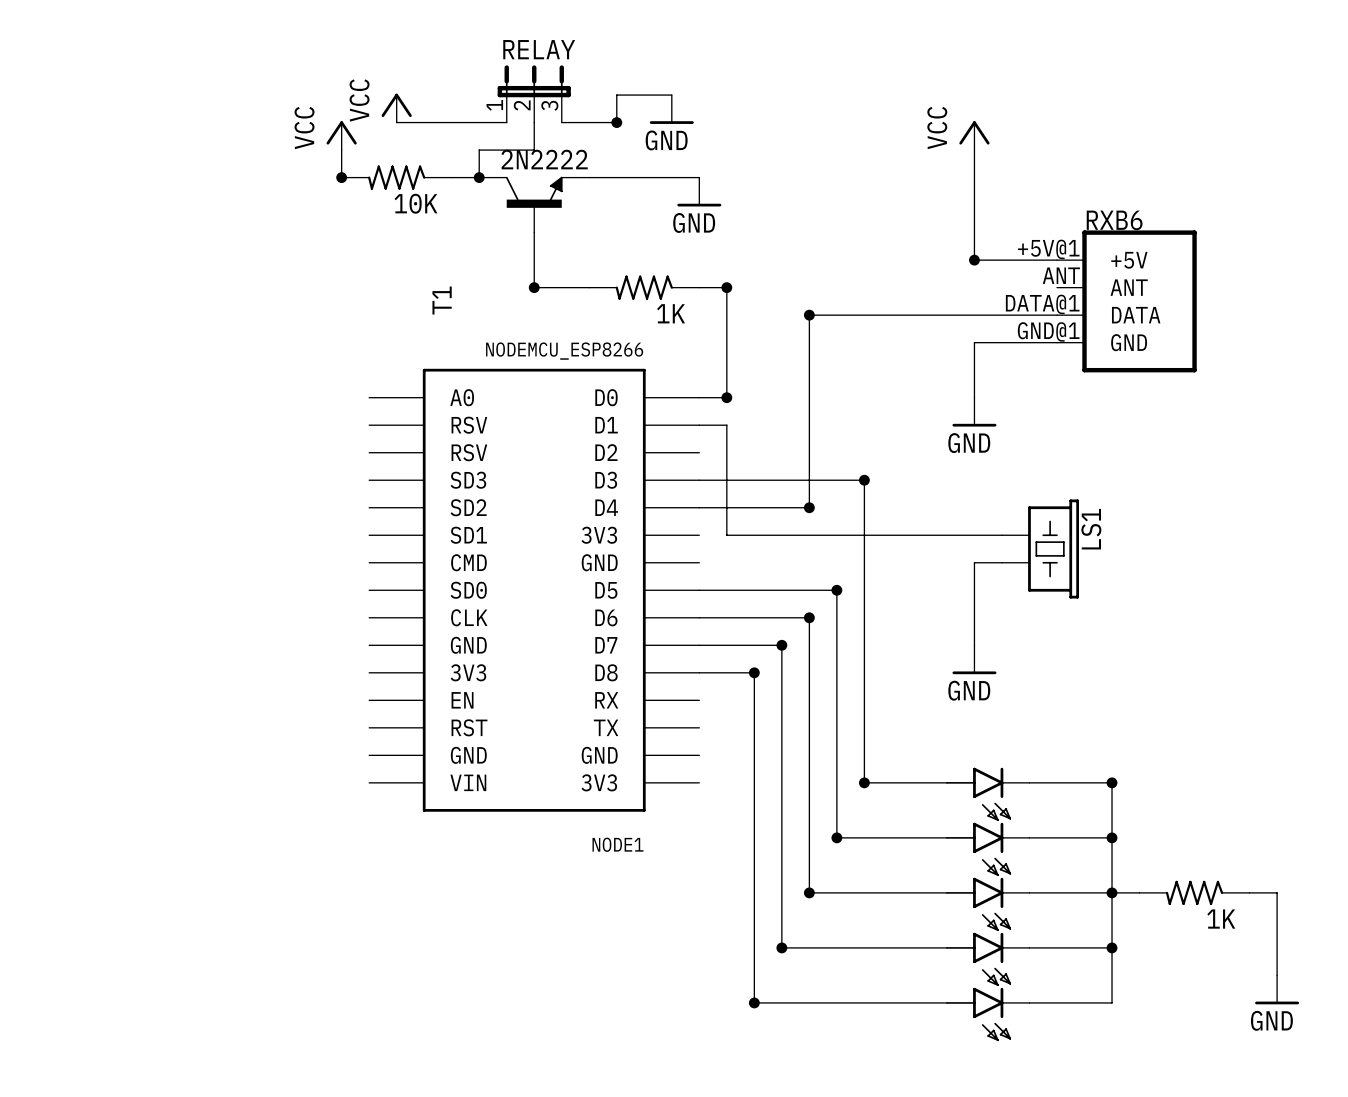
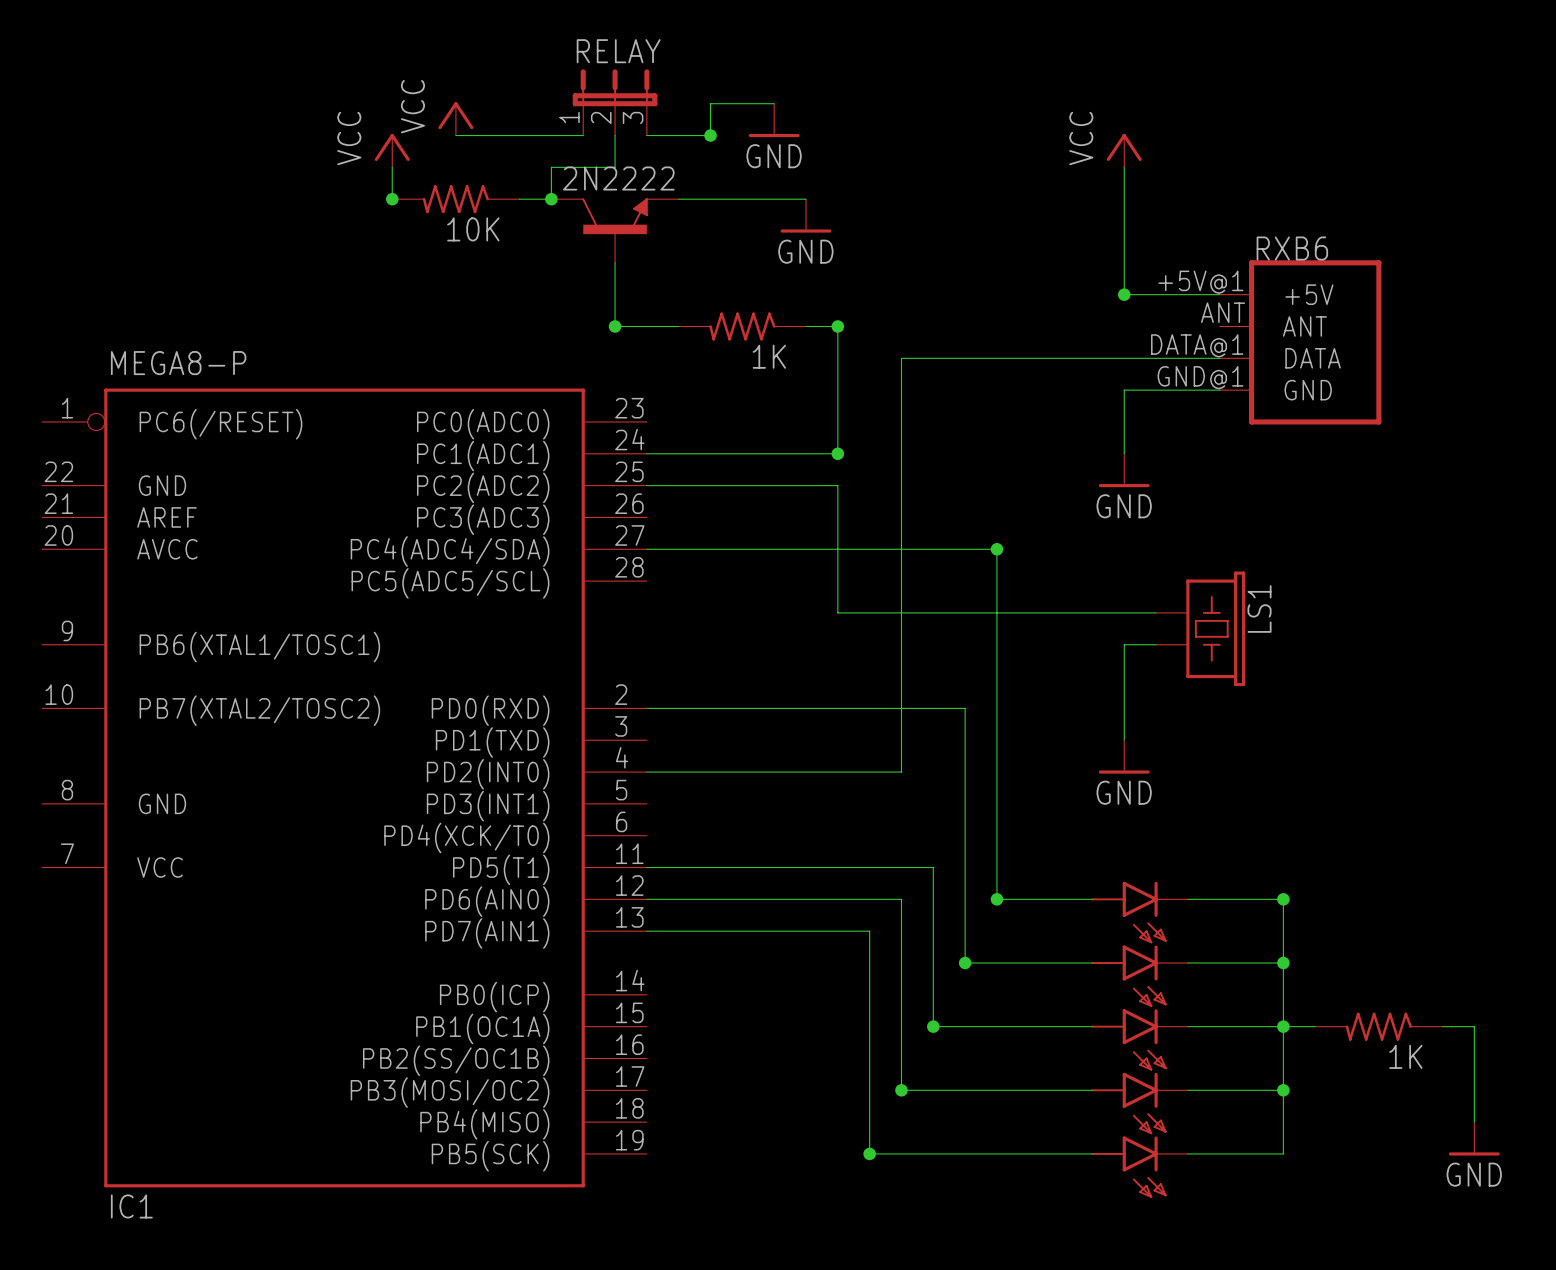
T1 name: T1 (442, 300) -> none
wire: (809, 315) (809, 507) (699, 507) -> (933, 358) (901, 358) (901, 740)
junction: (809, 315) -> none
wire: none -> (646, 453) (806, 453)
wire: none -> (646, 485) (806, 485)
wire: none -> (646, 549) (806, 549)
junction: (809, 507) -> none
NODE1: NODEMCU_ESP8266 (534, 590) -> none
wire: (699, 590) (836, 590) (836, 617) -> (933, 708) (965, 708)
junction: (836, 590) -> none
wire: none -> (646, 708) (806, 708)
wire: (809, 617) (809, 755) -> (646, 867) (933, 867)
junction: (809, 617) -> none
wire: (699, 645) (781, 645) -> none
junction: (781, 645) -> none
wire: none -> (646, 772) (806, 772)
wire: (754, 672) (754, 810) -> (646, 931) (869, 931)
junction: (754, 672) -> none
wire: (781, 672) (781, 782) -> (901, 772) (869, 772)
IC1: none -> MEGA8-P (344, 787)
wire: none -> (646, 899) (901, 899)

